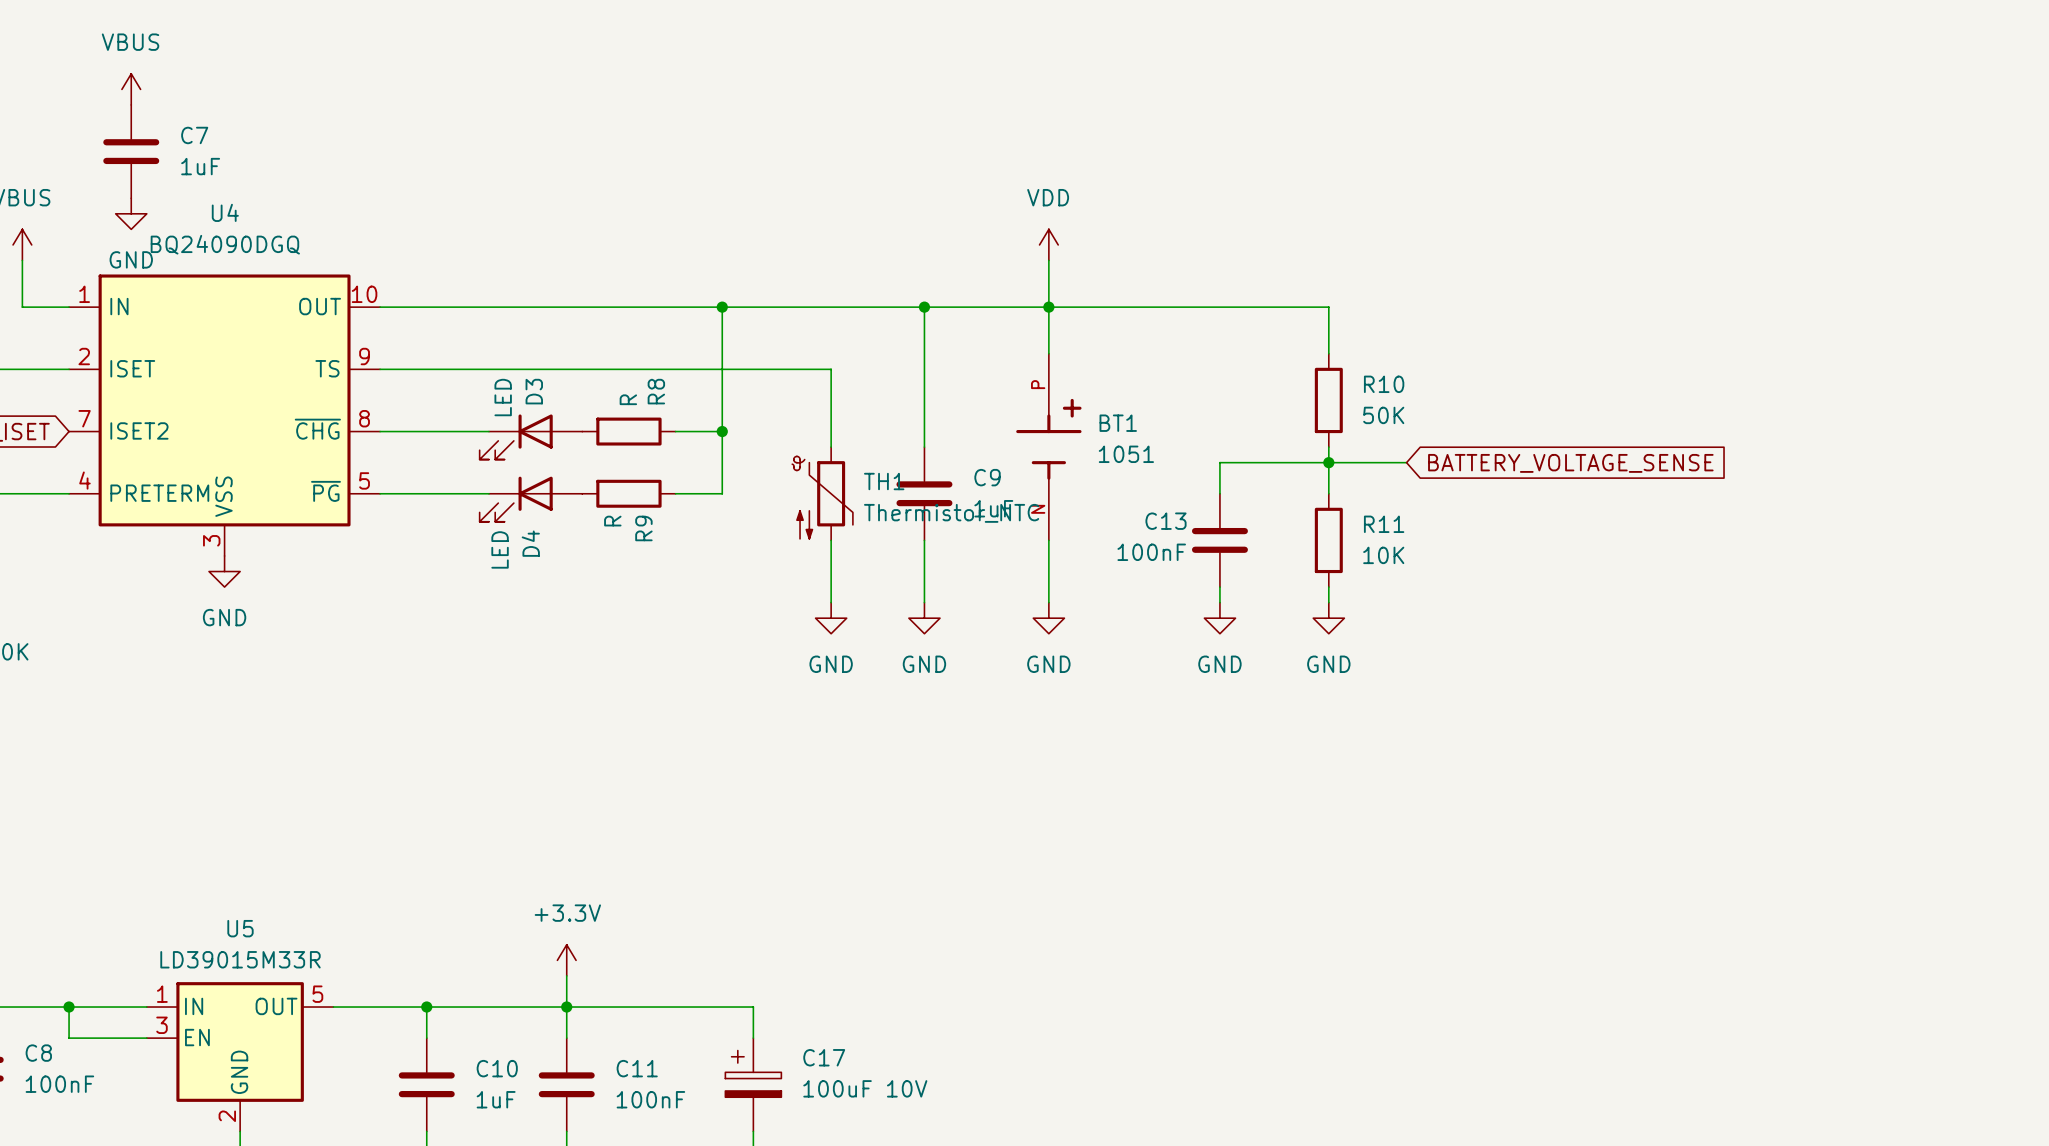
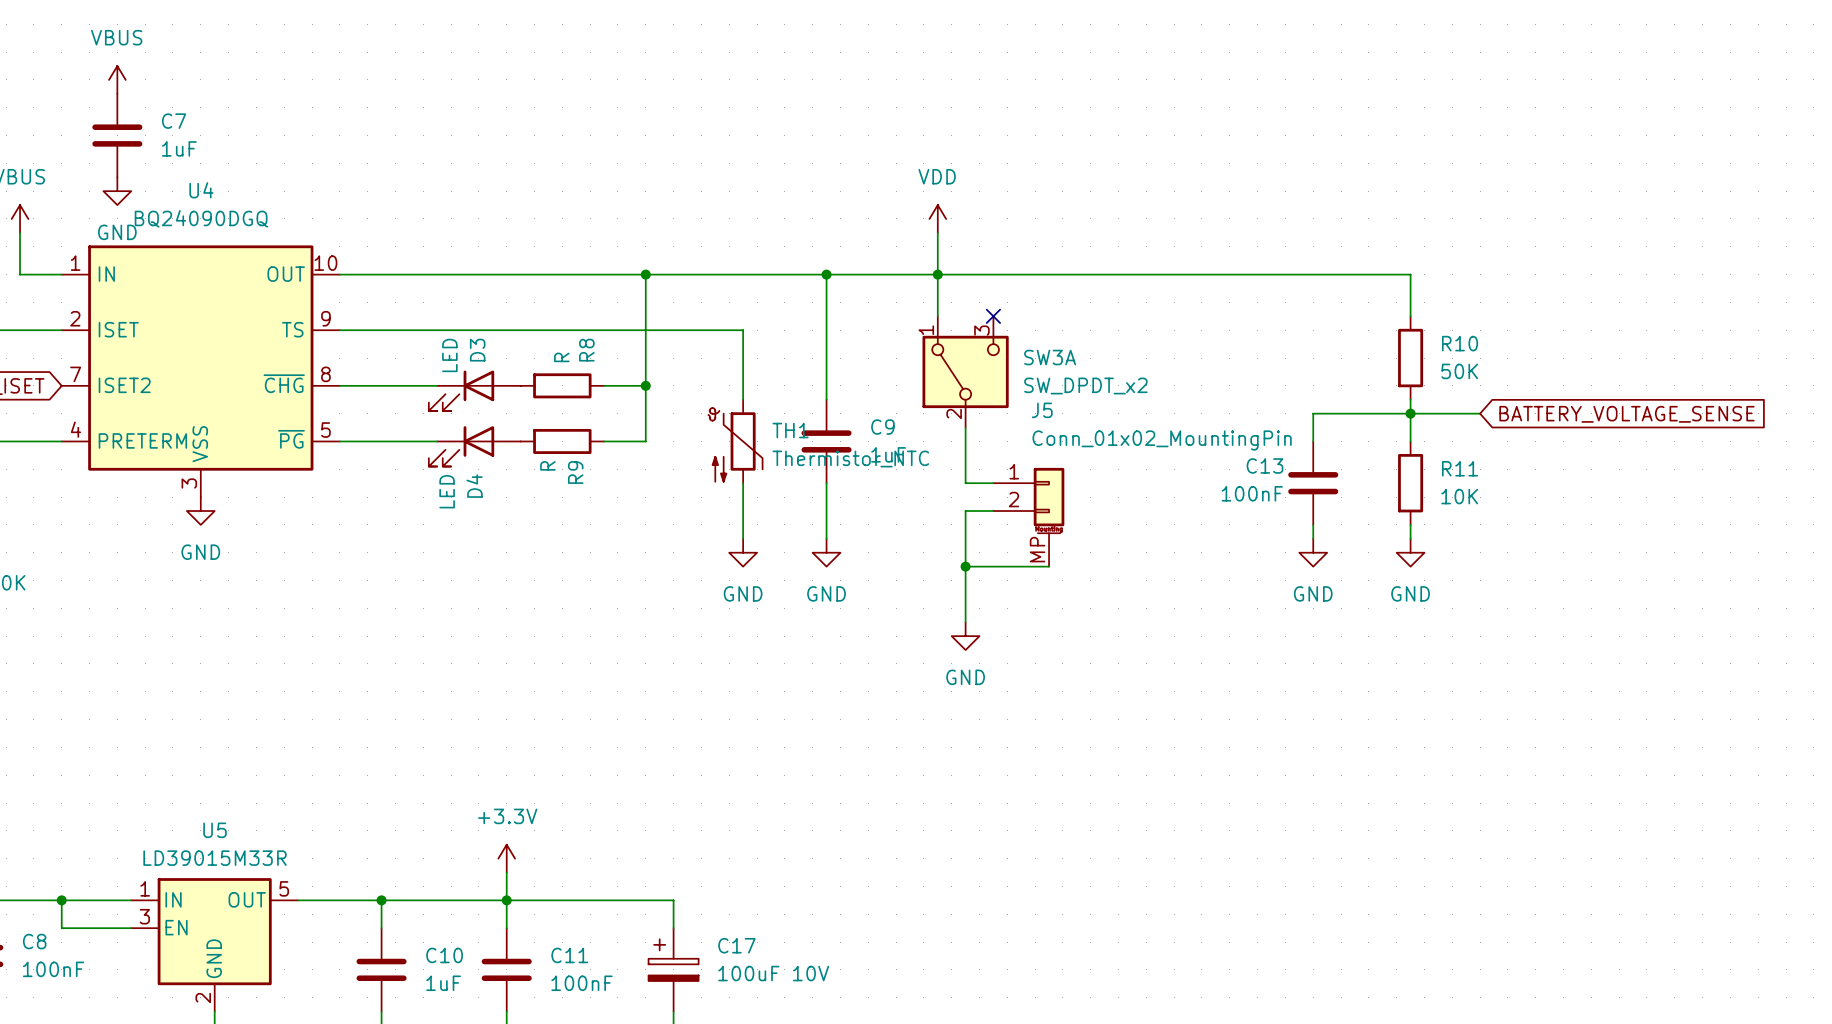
wire: (1328, 307) (1328, 353) -> (1188, 274) (1410, 274) (1410, 316)
no-connect mark: none -> (993, 316)
R10 position: (1328, 400) -> (1410, 358)
SW3A: none -> SW_DPDT_x2 (965, 371)
BT1: 1051 (1048, 447) -> none
wire: (1328, 447) (1328, 493) -> (1410, 399) (1410, 441)
junction: (1328, 462) -> none
wire: (1406, 462) (1219, 462) (1219, 493) -> (1480, 413) (1313, 413) (1313, 441)
junction: none -> (1410, 413)
global label position: BATTERY_VOLTAGE_SENSE (1570, 463) -> BATTERY_VOLTAGE_SENSE (1626, 414)
wire: none -> (965, 427) (965, 483) (993, 483)
wire: (1048, 540) (1048, 602) -> none
C13 position: (1219, 540) -> (1313, 483)
R11 position: (1328, 540) -> (1410, 483)
wire: none -> (993, 511) (965, 511) (965, 622)
J5: none -> Conn_01x02_MountingPin (1028, 517)
wire: (1219, 587) (1219, 602) -> (1313, 524) (1313, 538)
wire: (1328, 587) (1328, 602) -> (1410, 524) (1410, 538)
power symbol: GND (1048, 618) -> none
power symbol: GND (1219, 618) -> none
power symbol: GND (1328, 618) -> none
power symbol: none -> GND (1313, 552)
power symbol: none -> GND (1410, 552)
wire: none -> (965, 566) (1049, 566)
junction: none -> (965, 566)
power symbol: none -> GND (965, 636)

